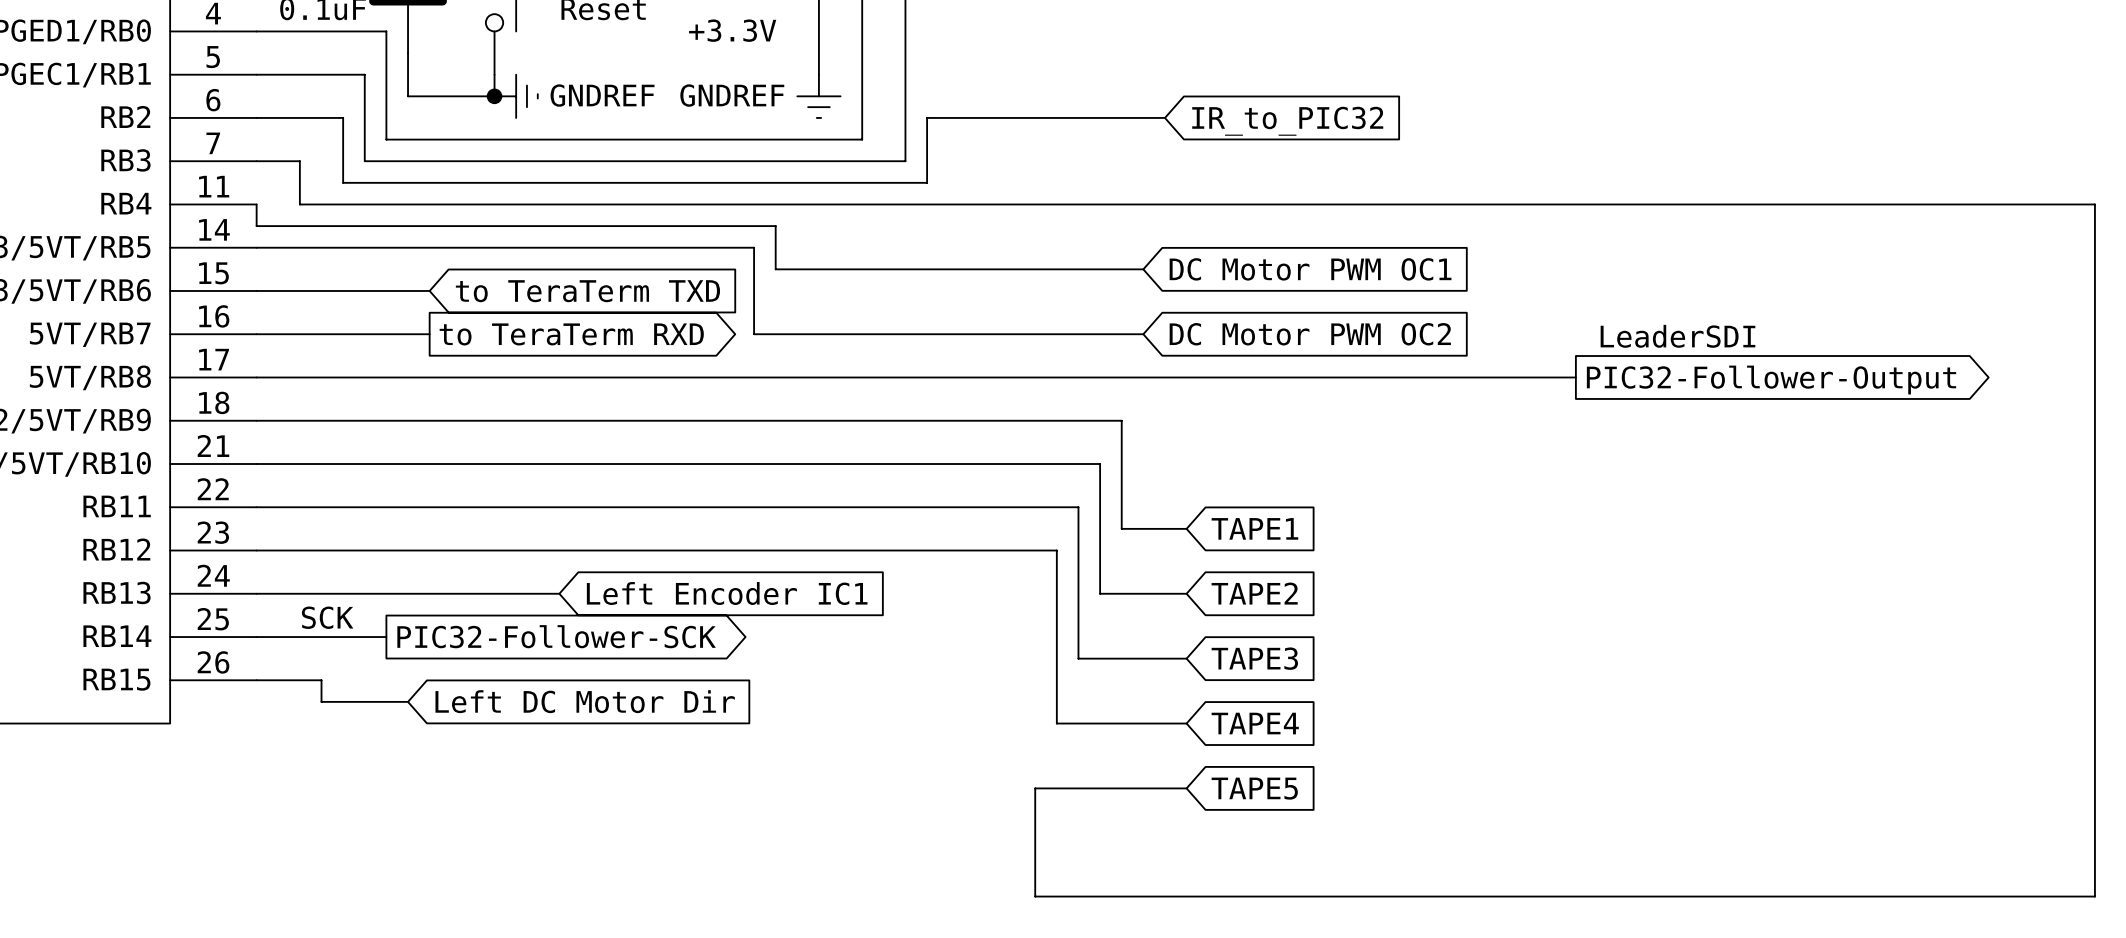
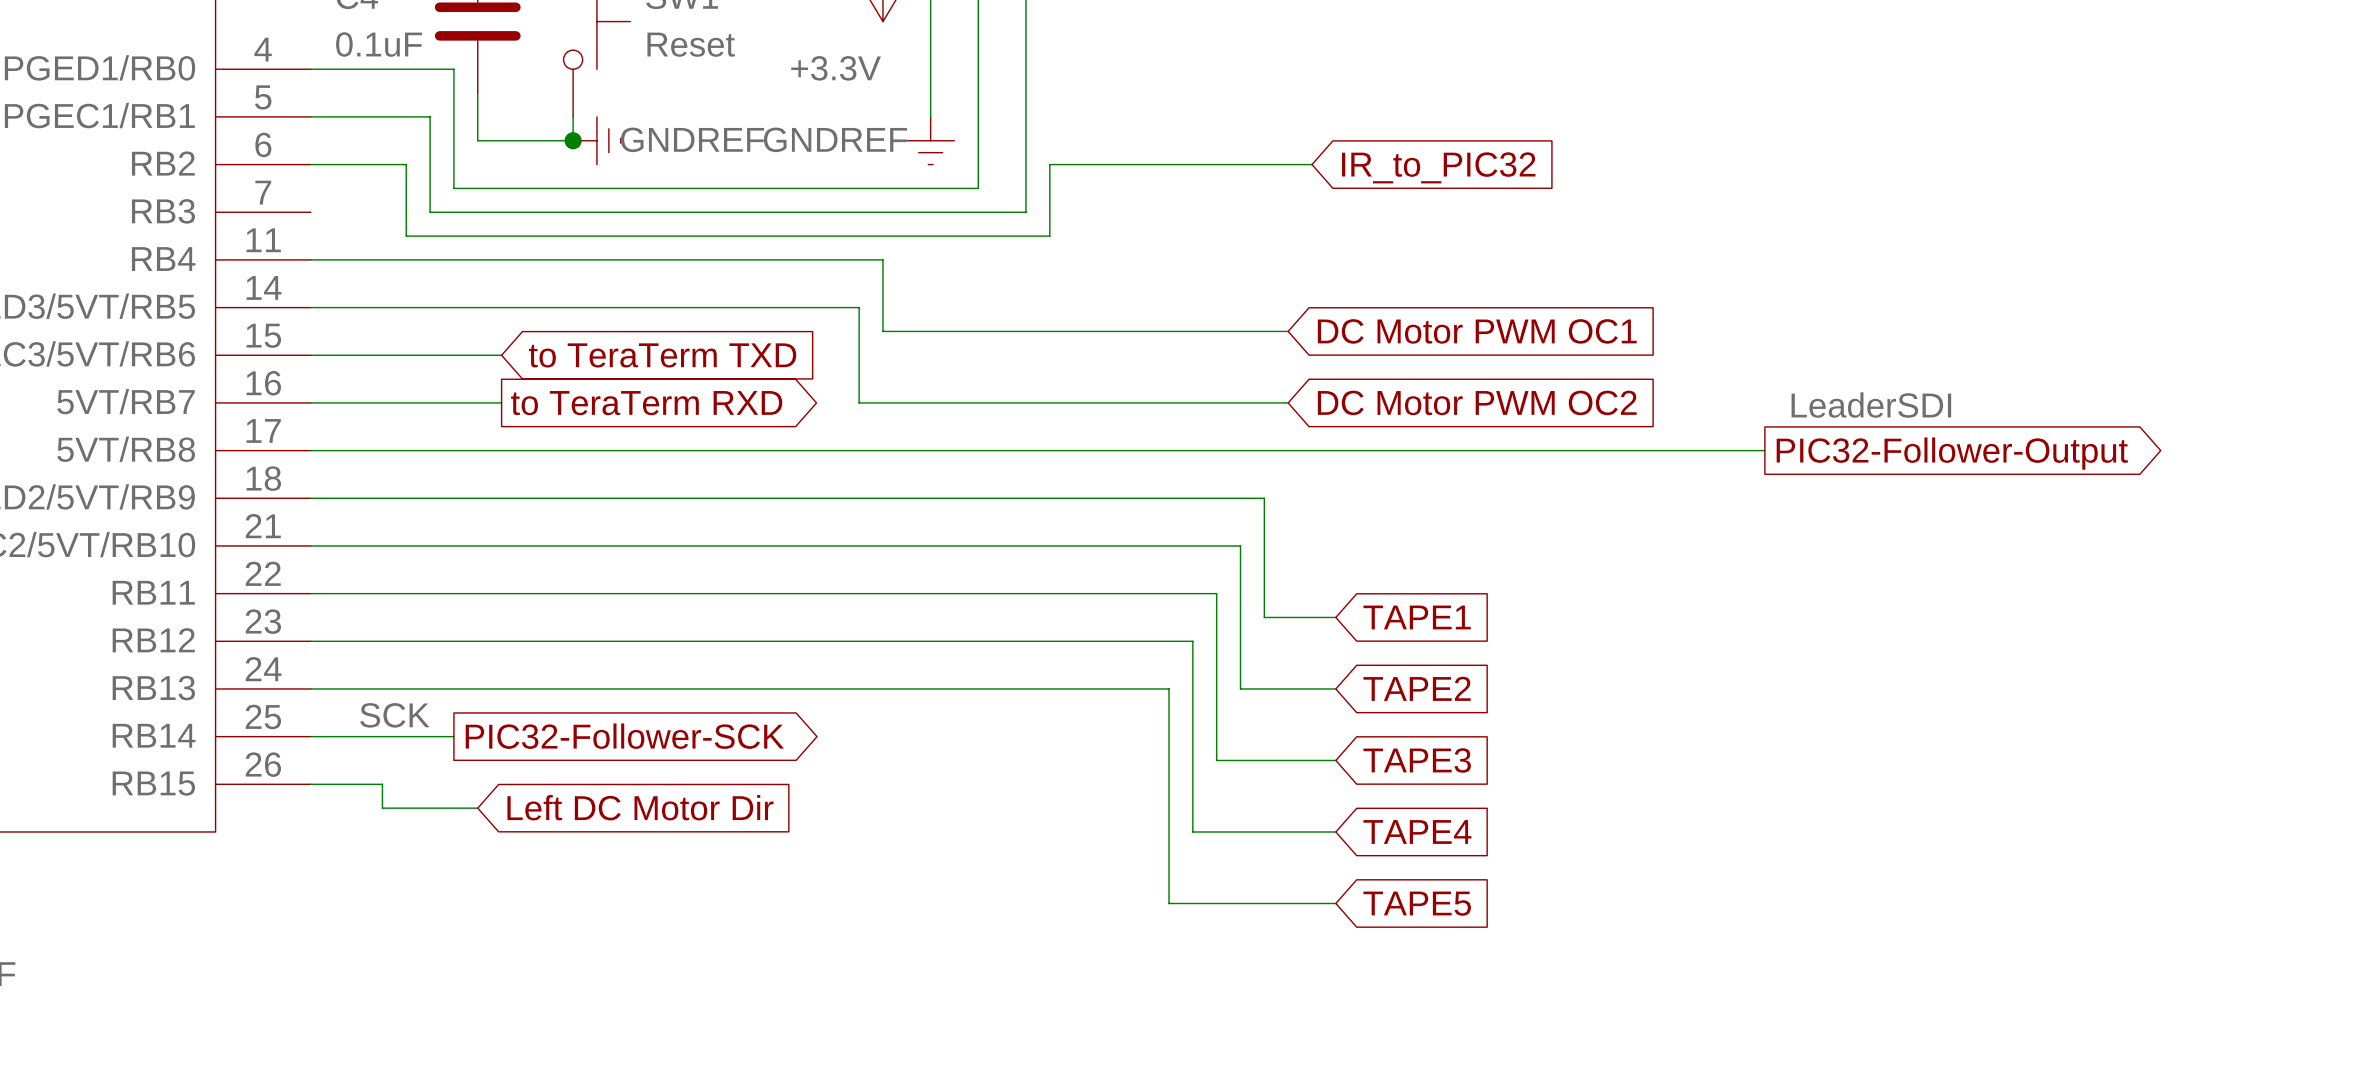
wire: (256, 161) (299, 161) (299, 204) -> (310, 259) (358, 259)
wire: (256, 204) (256, 226) (775, 226) -> (882, 259) (882, 283)
wire: (775, 204) (2094, 204) (2094, 896) (1035, 896) (1035, 788) -> (644, 688) (1169, 688) (1169, 903)
global label: Left Encoder IC1 (727, 593) -> none

